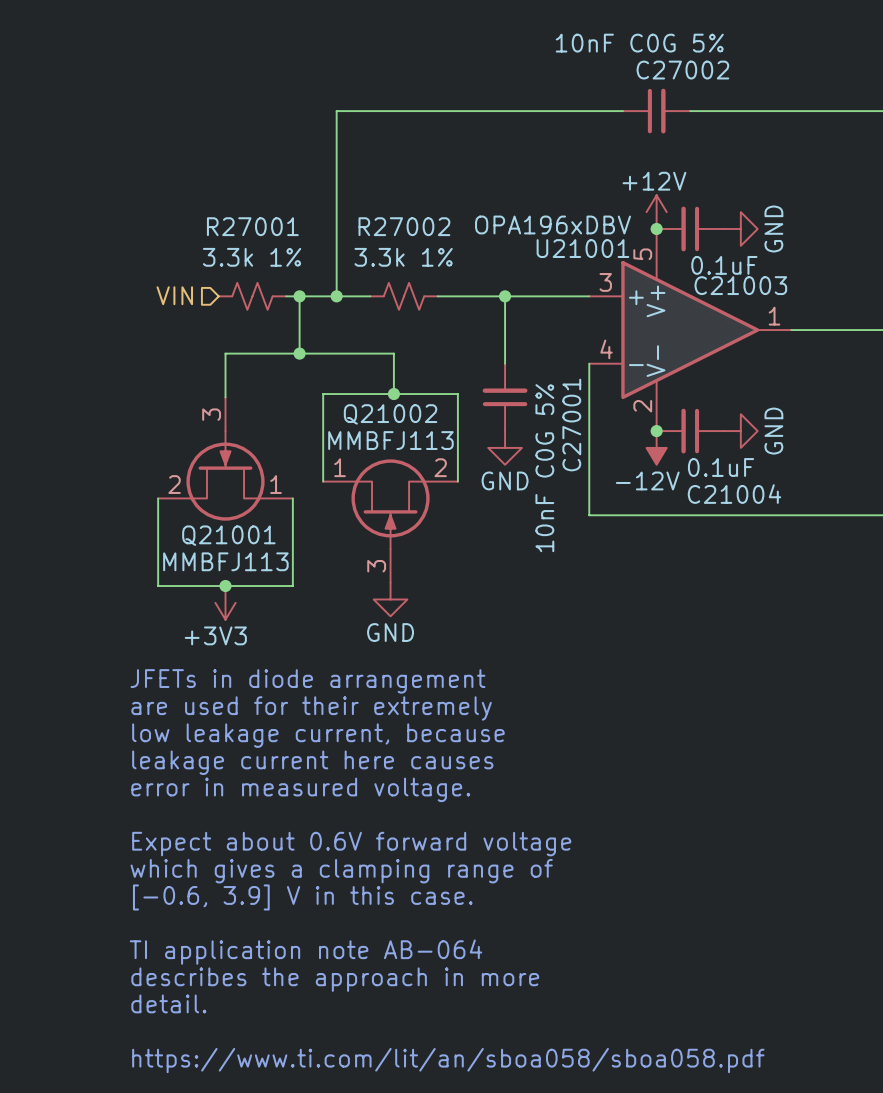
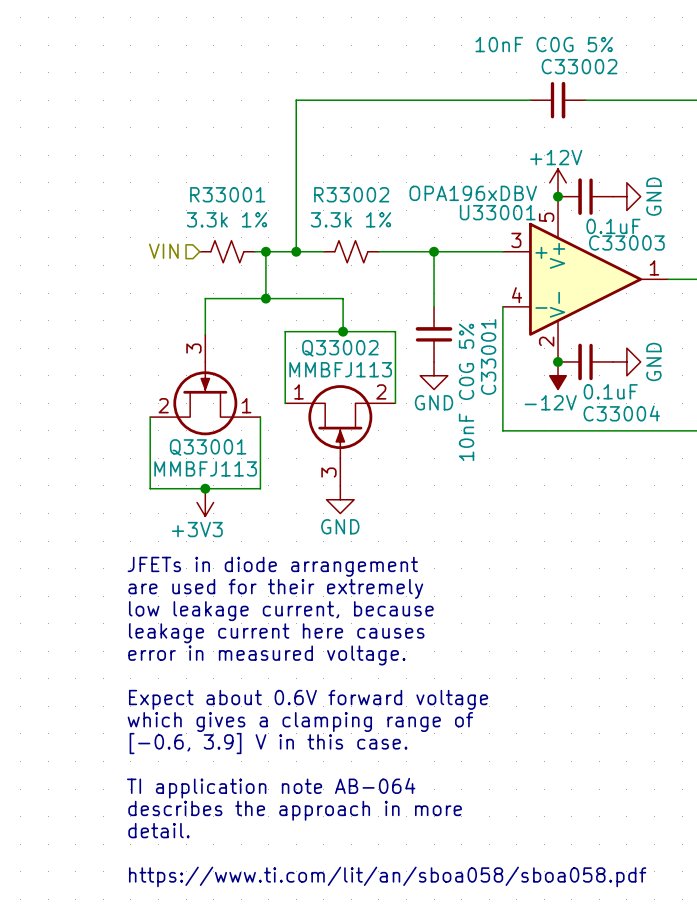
C27002 name: C27002 (682, 70) -> C33002 (579, 66)
R27001 name: R27001 (252, 226) -> R33001 (227, 194)
R27002 name: R27002 (404, 226) -> R33002 (351, 194)
U21001 name: U21001 (582, 248) -> U33001 (497, 212)
C21003 name: C21003 (740, 285) -> C33003 (626, 242)
Q21002 name: Q21002 (390, 414) -> Q33002 (340, 348)
C27001 name: C27001 (571, 425) -> C33001 (488, 357)
C21004 name: C21004 (734, 494) -> C33004 (621, 413)
Q21001 name: Q21001 (228, 535) -> Q33001 (208, 447)

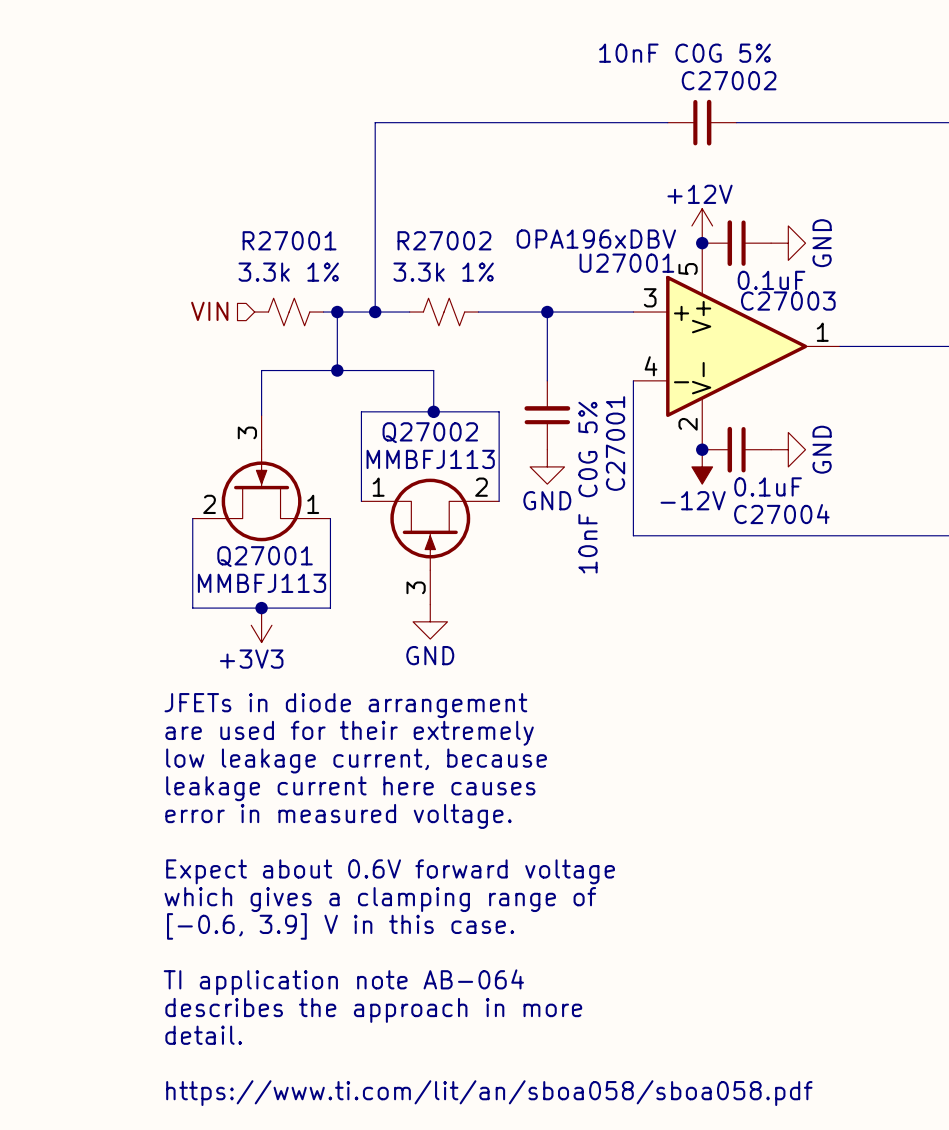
C33002 name: C33002 (579, 66) -> C27002 (729, 80)
R33001 name: R33001 (227, 194) -> R27001 (289, 240)
R33002 name: R33002 (351, 194) -> R27002 (444, 240)
U33001 name: U33001 (497, 212) -> U27001 (626, 263)
C33003 name: C33003 (626, 242) -> C27003 (788, 301)
Q33002 name: Q33002 (340, 348) -> Q27002 (430, 432)
C33001 name: C33001 (488, 357) -> C27001 (615, 443)
C33004 name: C33004 (621, 413) -> C27004 (781, 514)
Q33001 name: Q33001 (208, 447) -> Q27001 (265, 556)

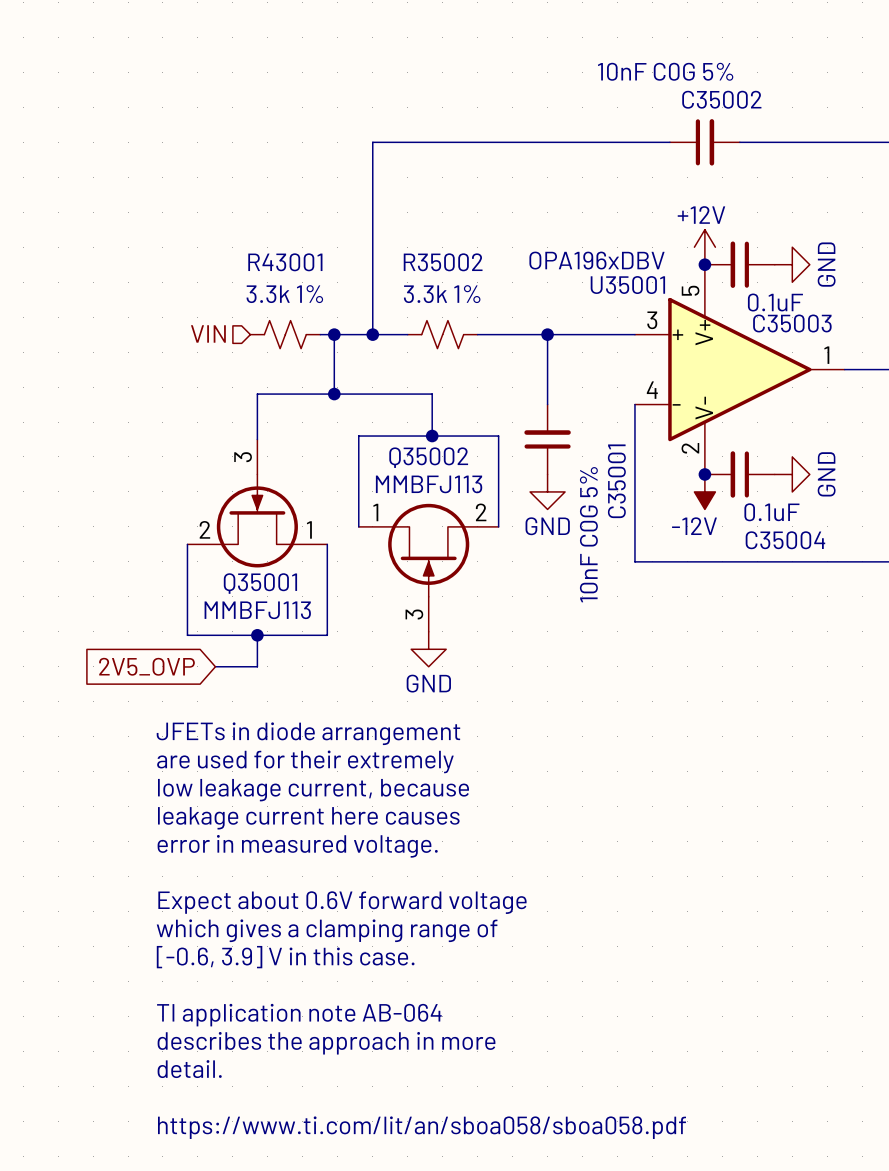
C27002 name: C27002 (729, 80) -> C35002 (721, 99)
R27001 name: R27001 (289, 240) -> R43001 (285, 262)
R27002 name: R27002 (444, 240) -> R35002 (443, 262)
U27001 name: U27001 (626, 263) -> U35001 (627, 285)
C27003 name: C27003 (788, 301) -> C35003 (792, 323)
Q27002 name: Q27002 (430, 432) -> Q35002 (428, 457)
C27001 name: C27001 (615, 443) -> C35001 (616, 481)
C27004 name: C27004 (781, 514) -> C35004 (785, 540)
Q27001 name: Q27001 (265, 556) -> Q35001 (260, 583)
wire: none -> (257, 635) (257, 666) (215, 666)
power symbol: +3V3 (261, 625) -> none
global label: none -> 2V5_OVP (146, 666)

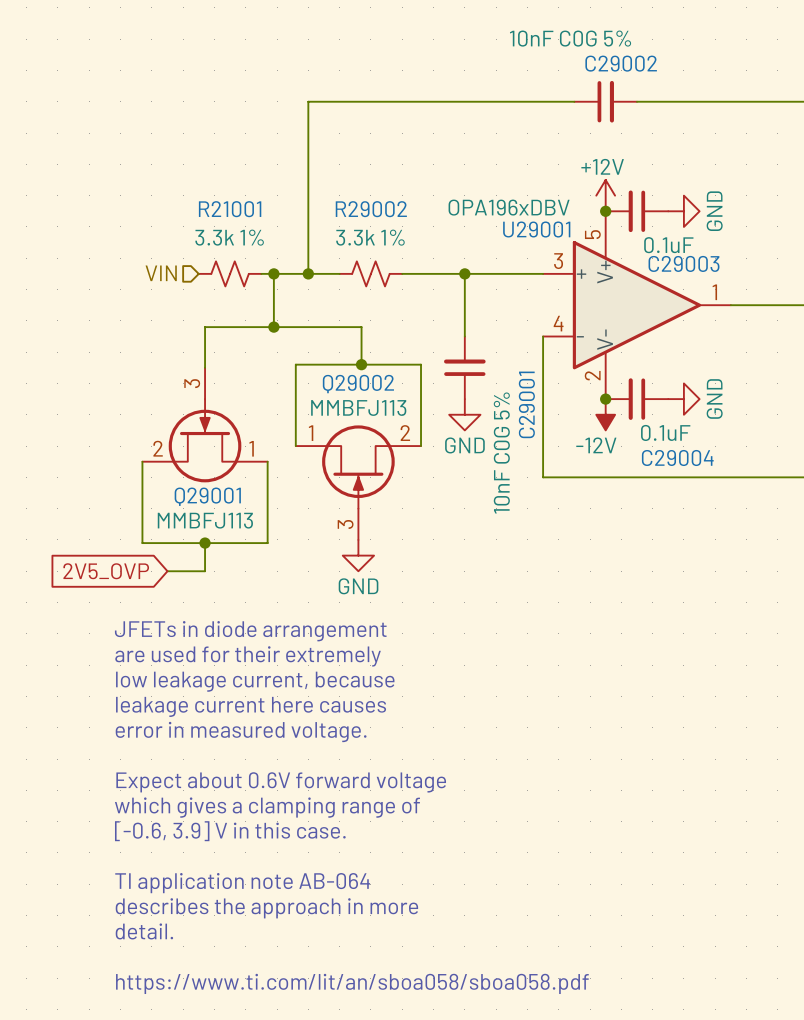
C35002 name: C35002 (721, 99) -> C29002 (621, 63)
R43001 name: R43001 (285, 262) -> R21001 (230, 209)
R35002 name: R35002 (443, 262) -> R29002 (371, 209)
U35001 name: U35001 (627, 285) -> U29001 (536, 229)
C35003 name: C35003 (792, 323) -> C29003 (684, 263)
Q35002 name: Q35002 (428, 457) -> Q29002 (358, 384)
C35001 name: C35001 (616, 481) -> C29001 (526, 404)
C35004 name: C35004 (785, 540) -> C29004 (677, 457)
Q35001 name: Q35001 (260, 583) -> Q29001 (207, 496)

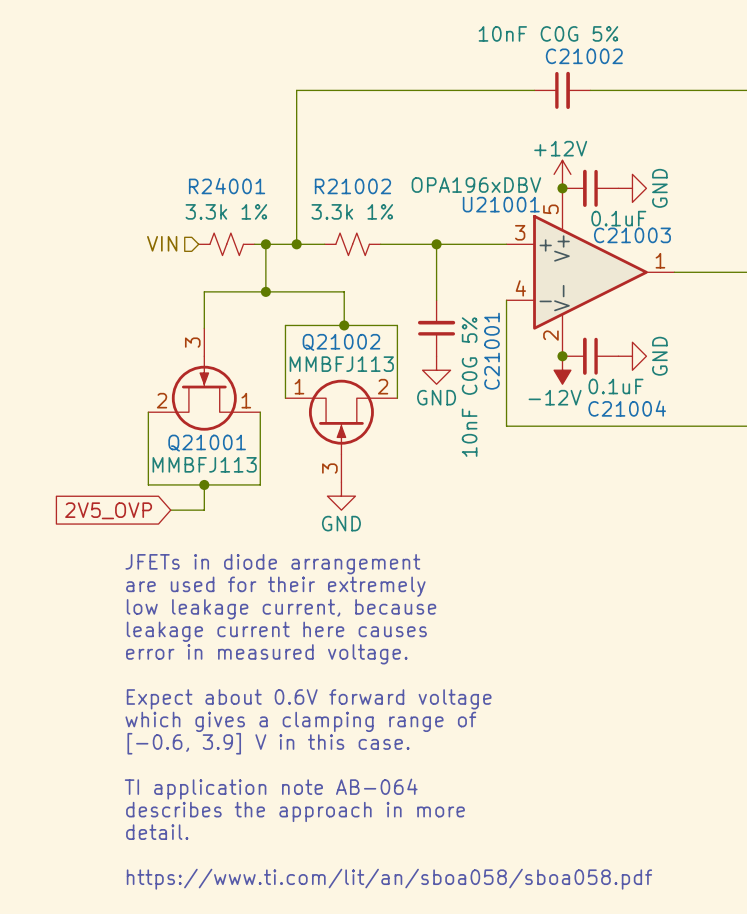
C29002 name: C29002 (621, 63) -> C21002 (584, 56)
R21001 name: R21001 (230, 209) -> R24001 (227, 186)
R29002 name: R29002 (371, 209) -> R21002 (352, 186)
U29001 name: U29001 (536, 229) -> U21001 (501, 204)
C29003 name: C29003 (684, 263) -> C21003 (632, 235)
Q29002 name: Q29002 (358, 384) -> Q21002 (341, 342)
C29001 name: C29001 (526, 404) -> C21001 (492, 351)
C29004 name: C29004 (677, 457) -> C21004 (627, 408)
Q29001 name: Q29001 (207, 496) -> Q21001 (207, 443)

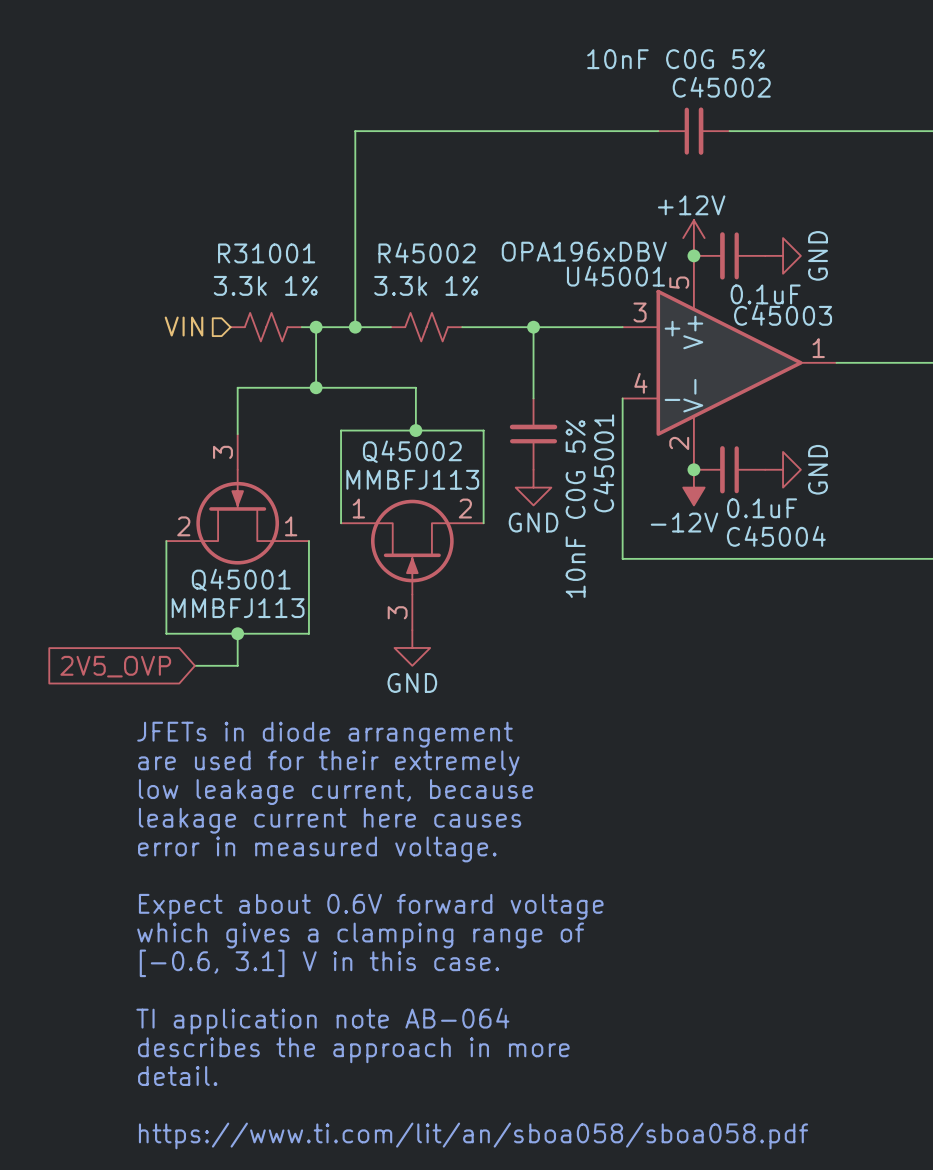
C21002 name: C21002 (584, 56) -> C45002 (721, 87)
R24001 name: R24001 (227, 186) -> R31001 (266, 253)
R21002 name: R21002 (352, 186) -> R45002 (427, 253)
U21001 name: U21001 (501, 204) -> U45001 (615, 276)
C21003 name: C21003 (632, 235) -> C45003 (783, 315)
Q21002 name: Q21002 (341, 342) -> Q45002 (412, 451)
C21001 name: C21001 (492, 351) -> C45001 (603, 463)
C21004 name: C21004 (627, 408) -> C45004 (776, 536)
Q21001 name: Q21001 (207, 443) -> Q45001 (241, 580)
text: [-0.6, 3.9] V in this case. (268, 743) -> [-0.6, 3.1] V in this case. (319, 963)

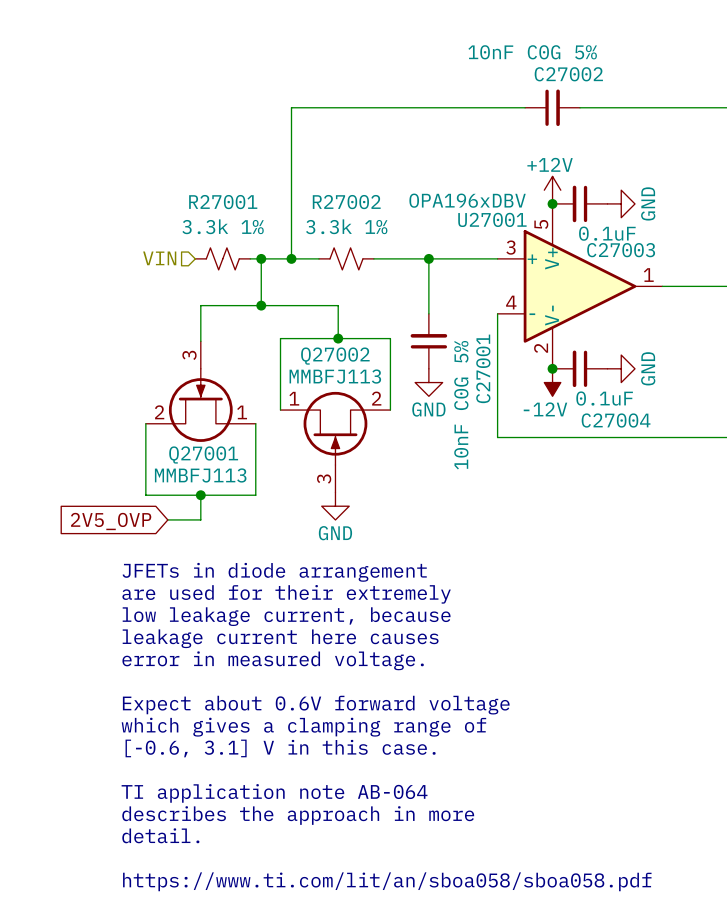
C45002 name: C45002 (721, 87) -> C27002 (568, 74)
R31001 name: R31001 (266, 253) -> R27001 (223, 202)
R45002 name: R45002 (427, 253) -> R27002 (346, 202)
U45001 name: U45001 (615, 276) -> U27001 (492, 219)
C45003 name: C45003 (783, 315) -> C27003 (621, 250)
Q45002 name: Q45002 (412, 451) -> Q27002 (335, 356)
C45001 name: C45001 (603, 463) -> C27001 (483, 368)
C45004 name: C45004 (776, 536) -> C27004 (616, 420)
Q45001 name: Q45001 (241, 580) -> Q27001 (203, 454)

